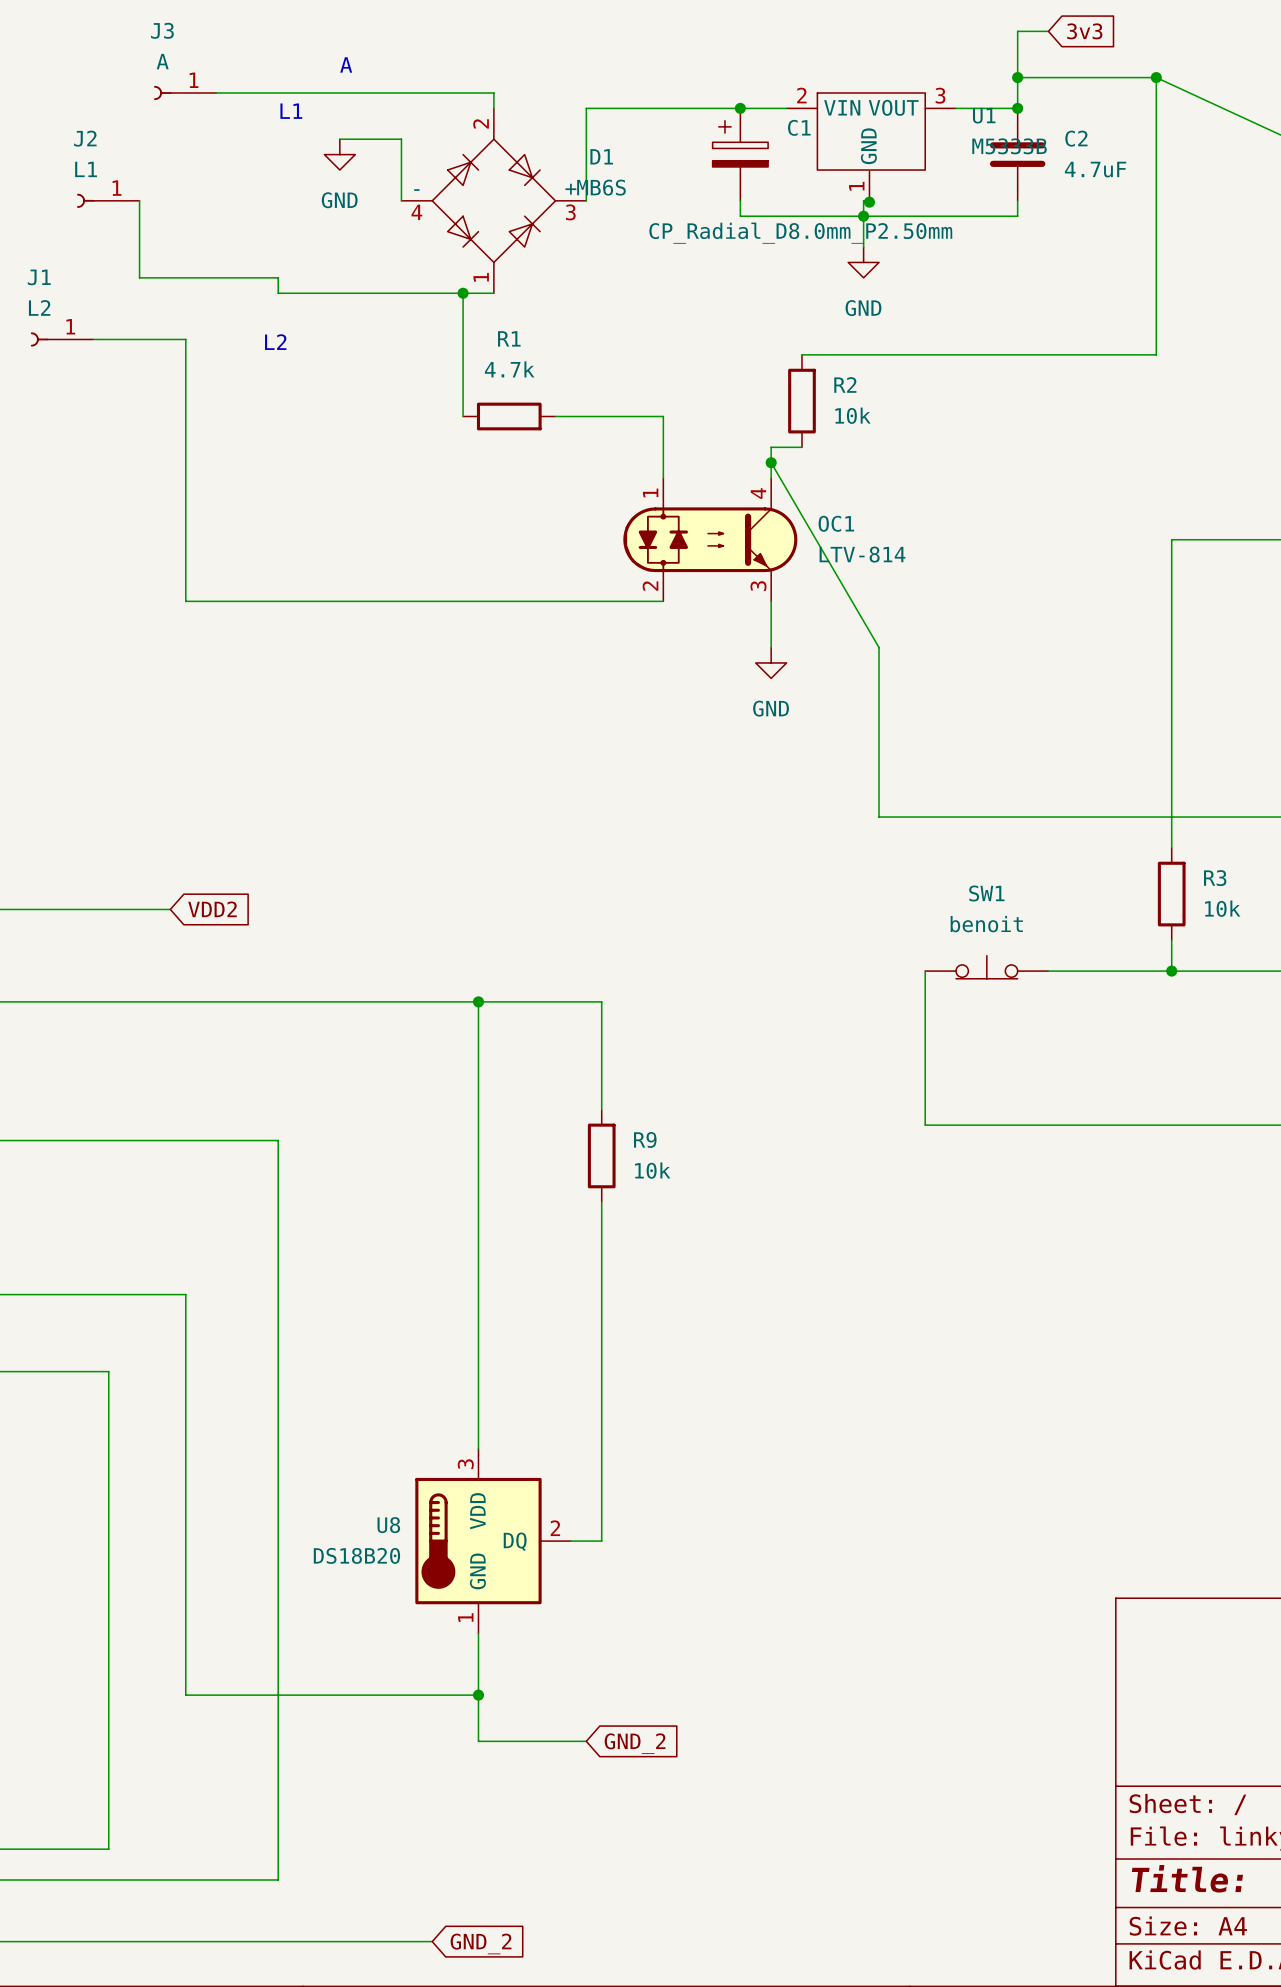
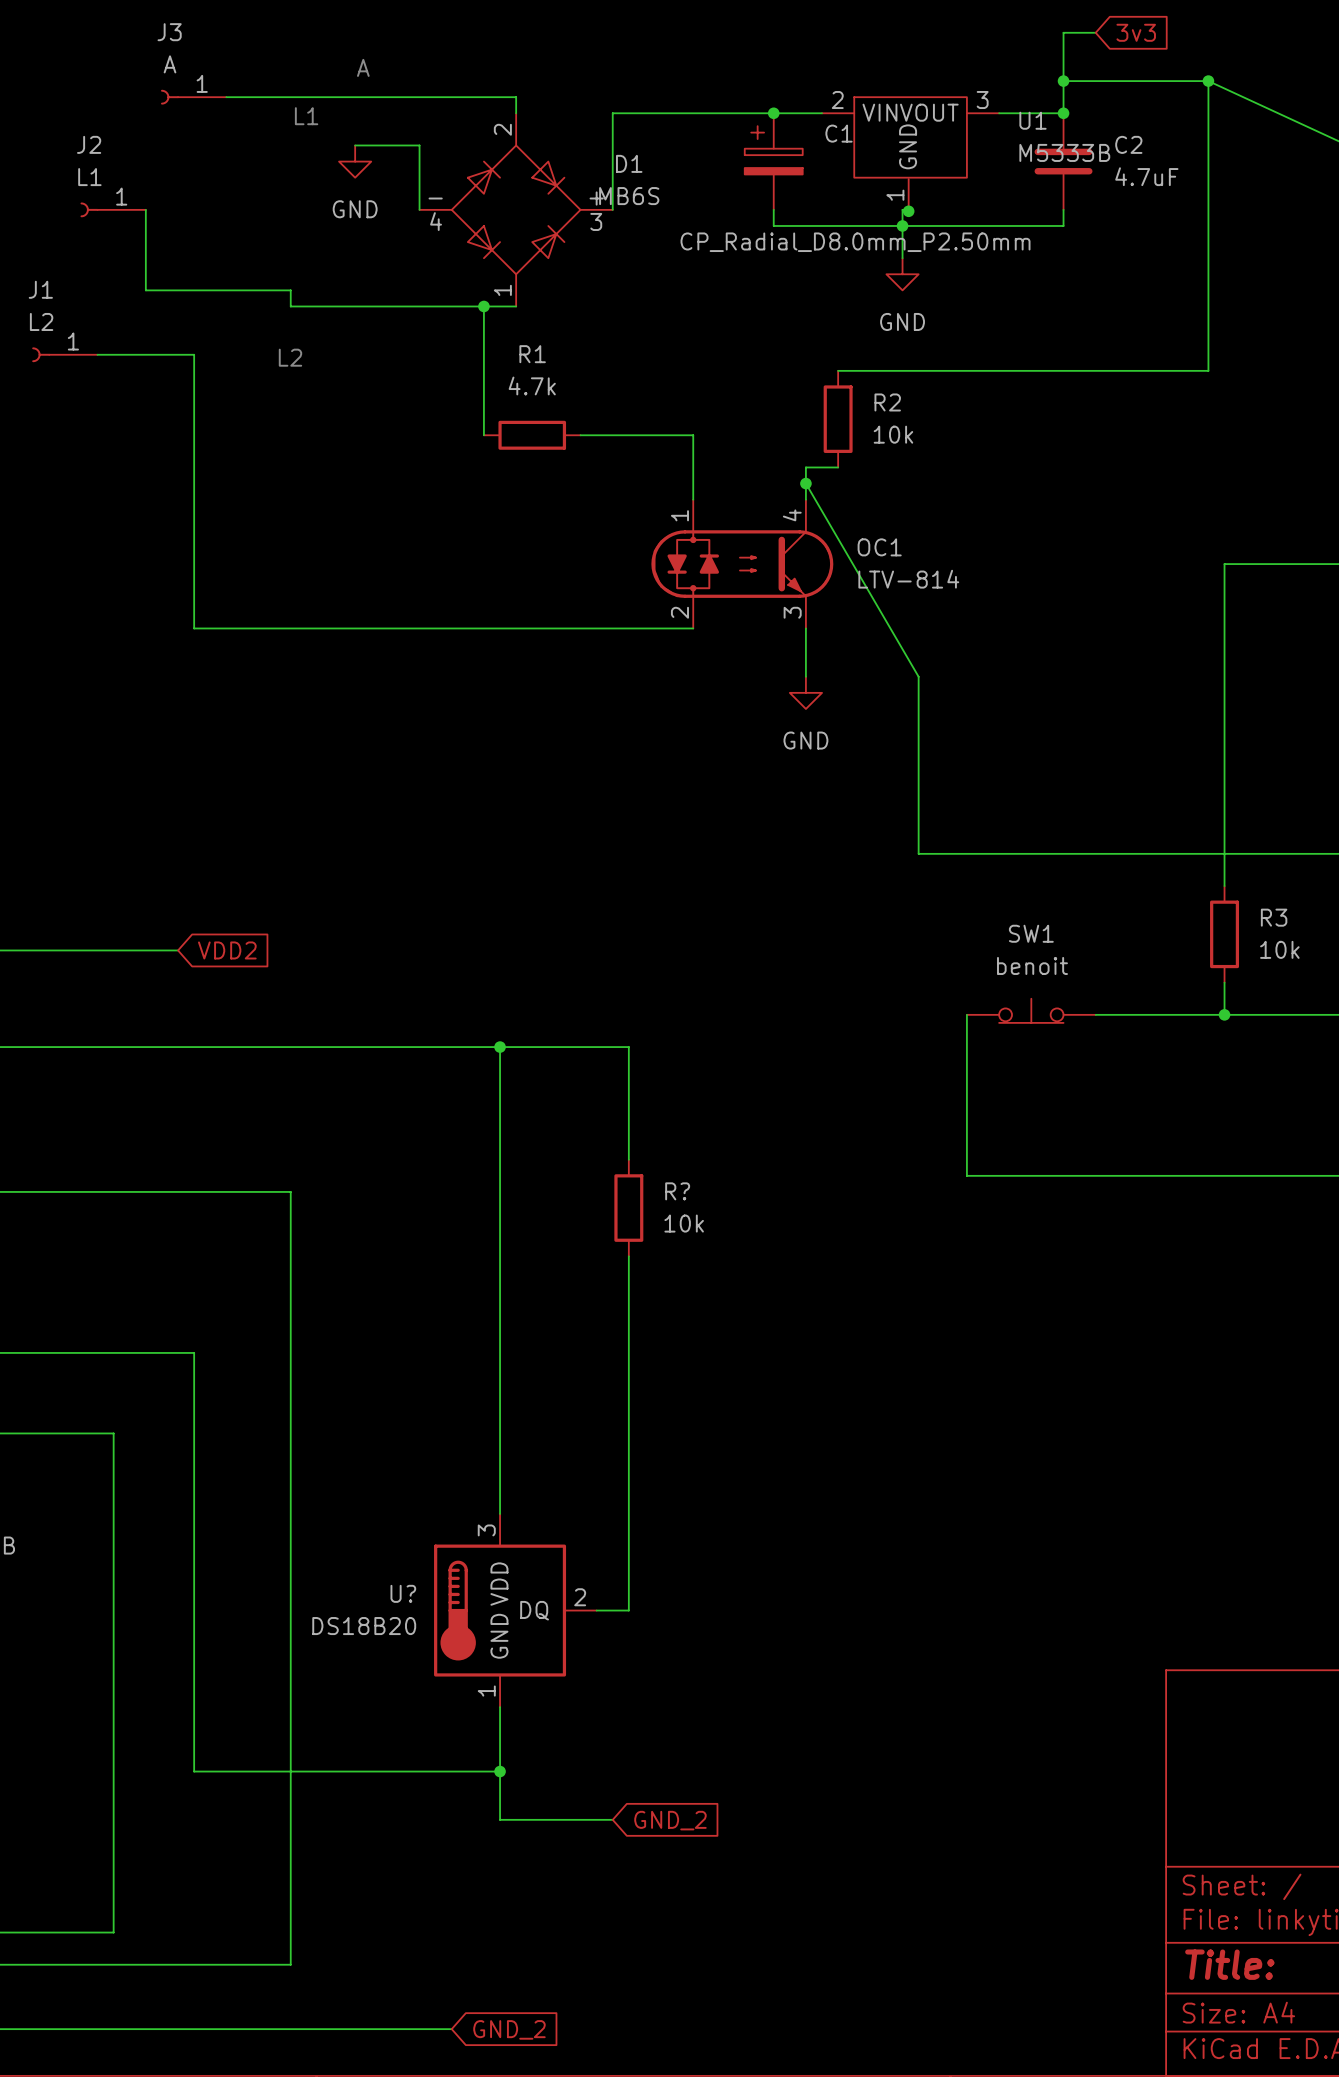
R9 name: R9 (645, 1139) -> R? (677, 1191)
U8 name: U8 (388, 1525) -> U? (403, 1593)

